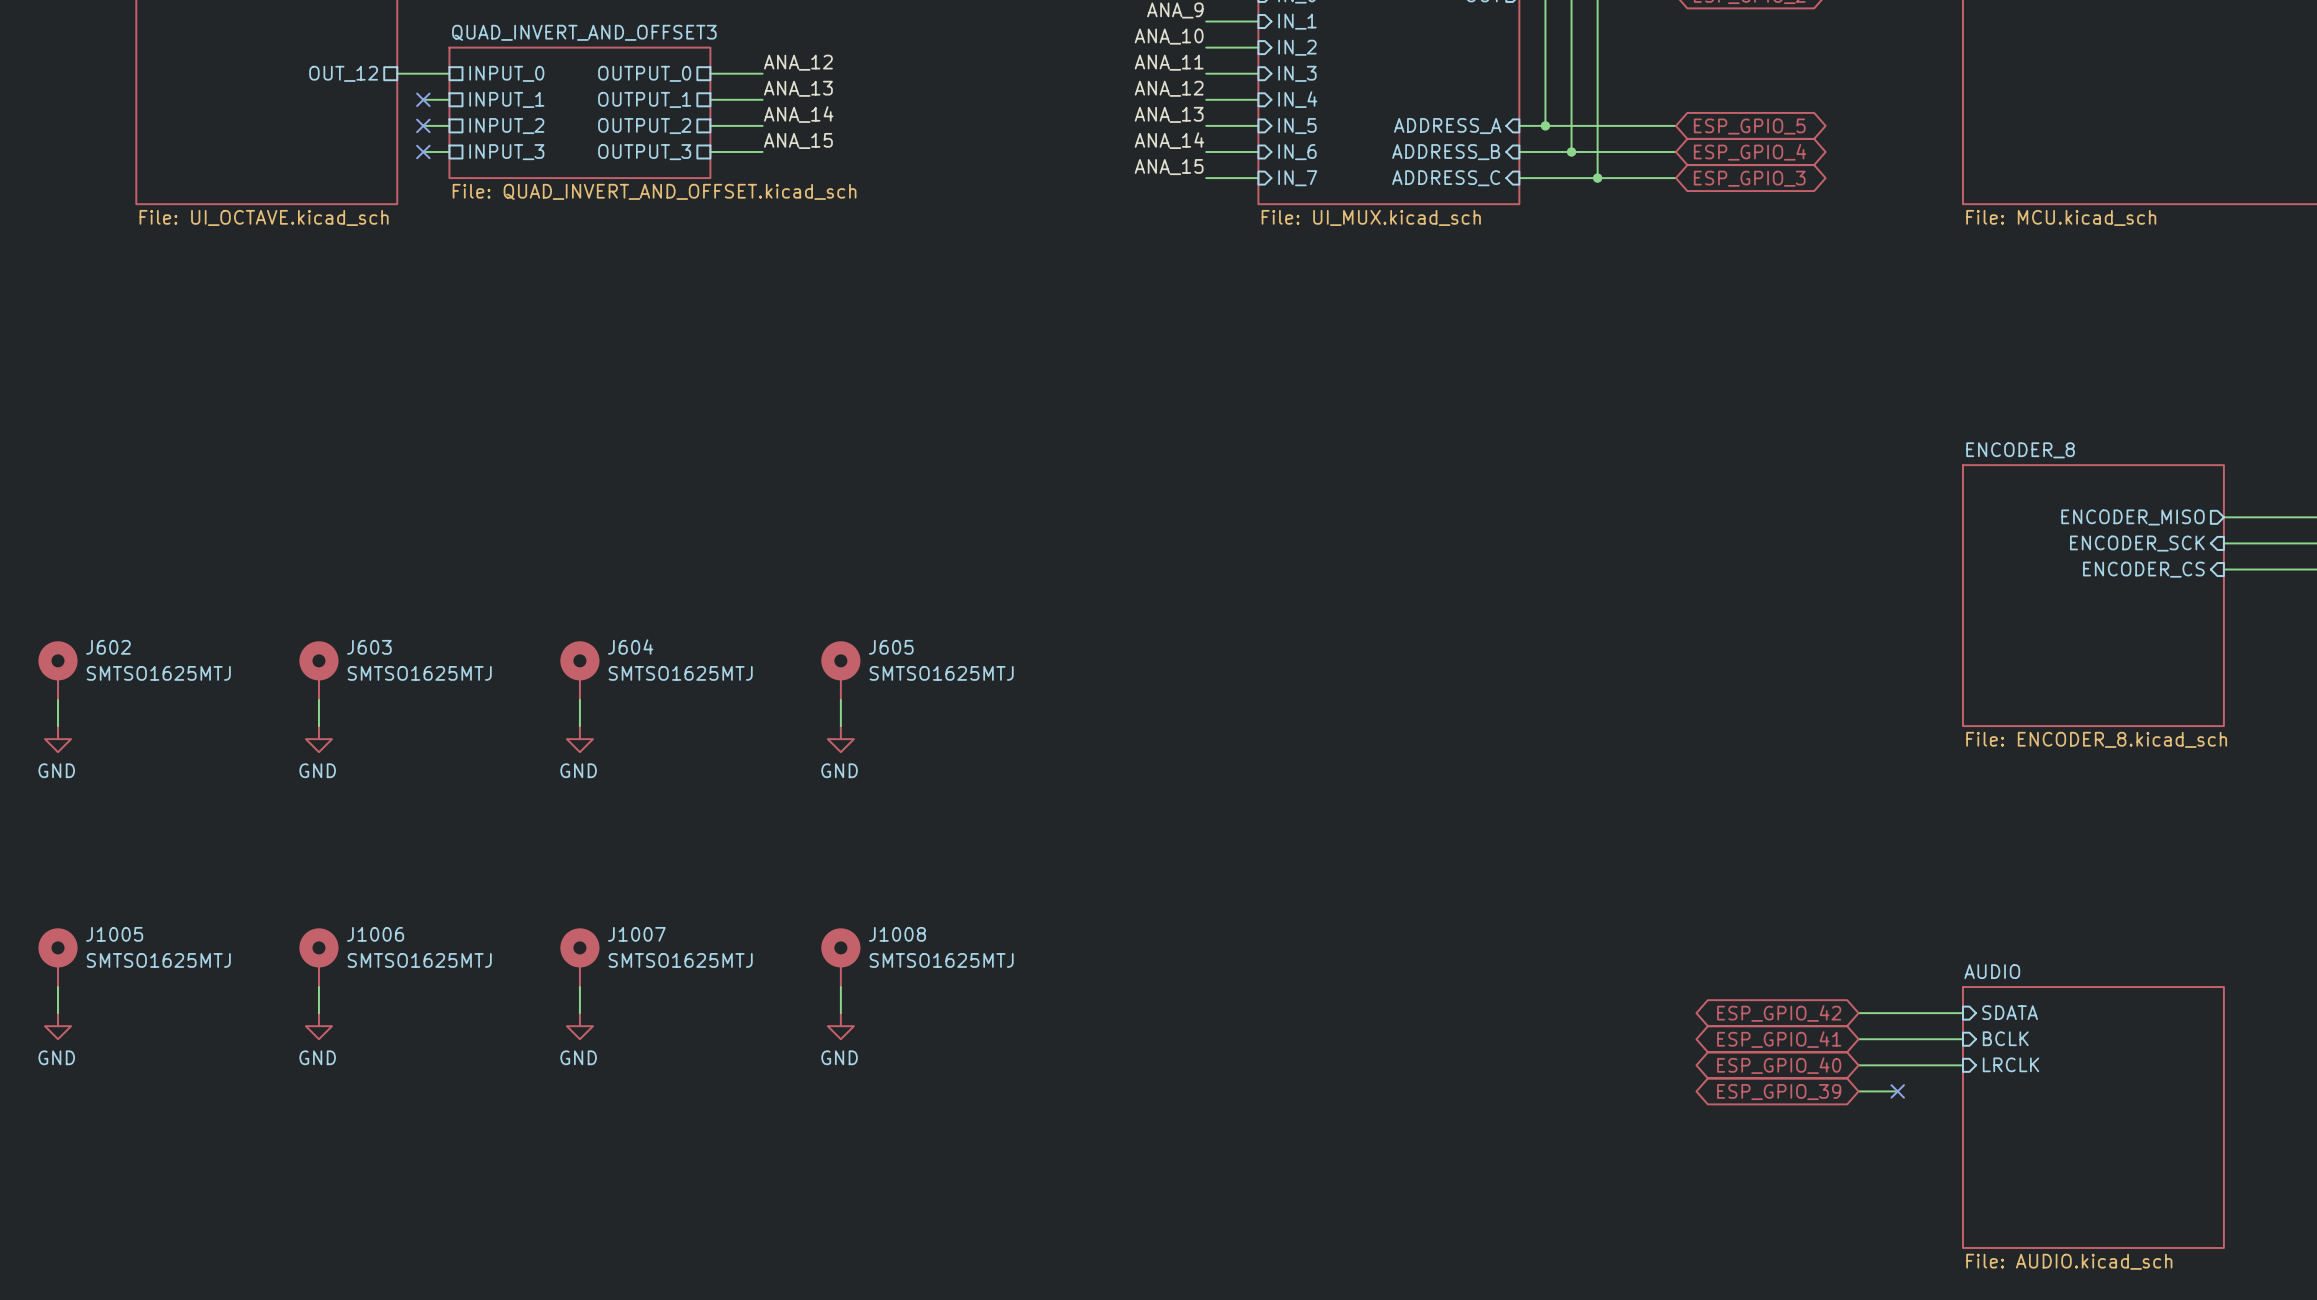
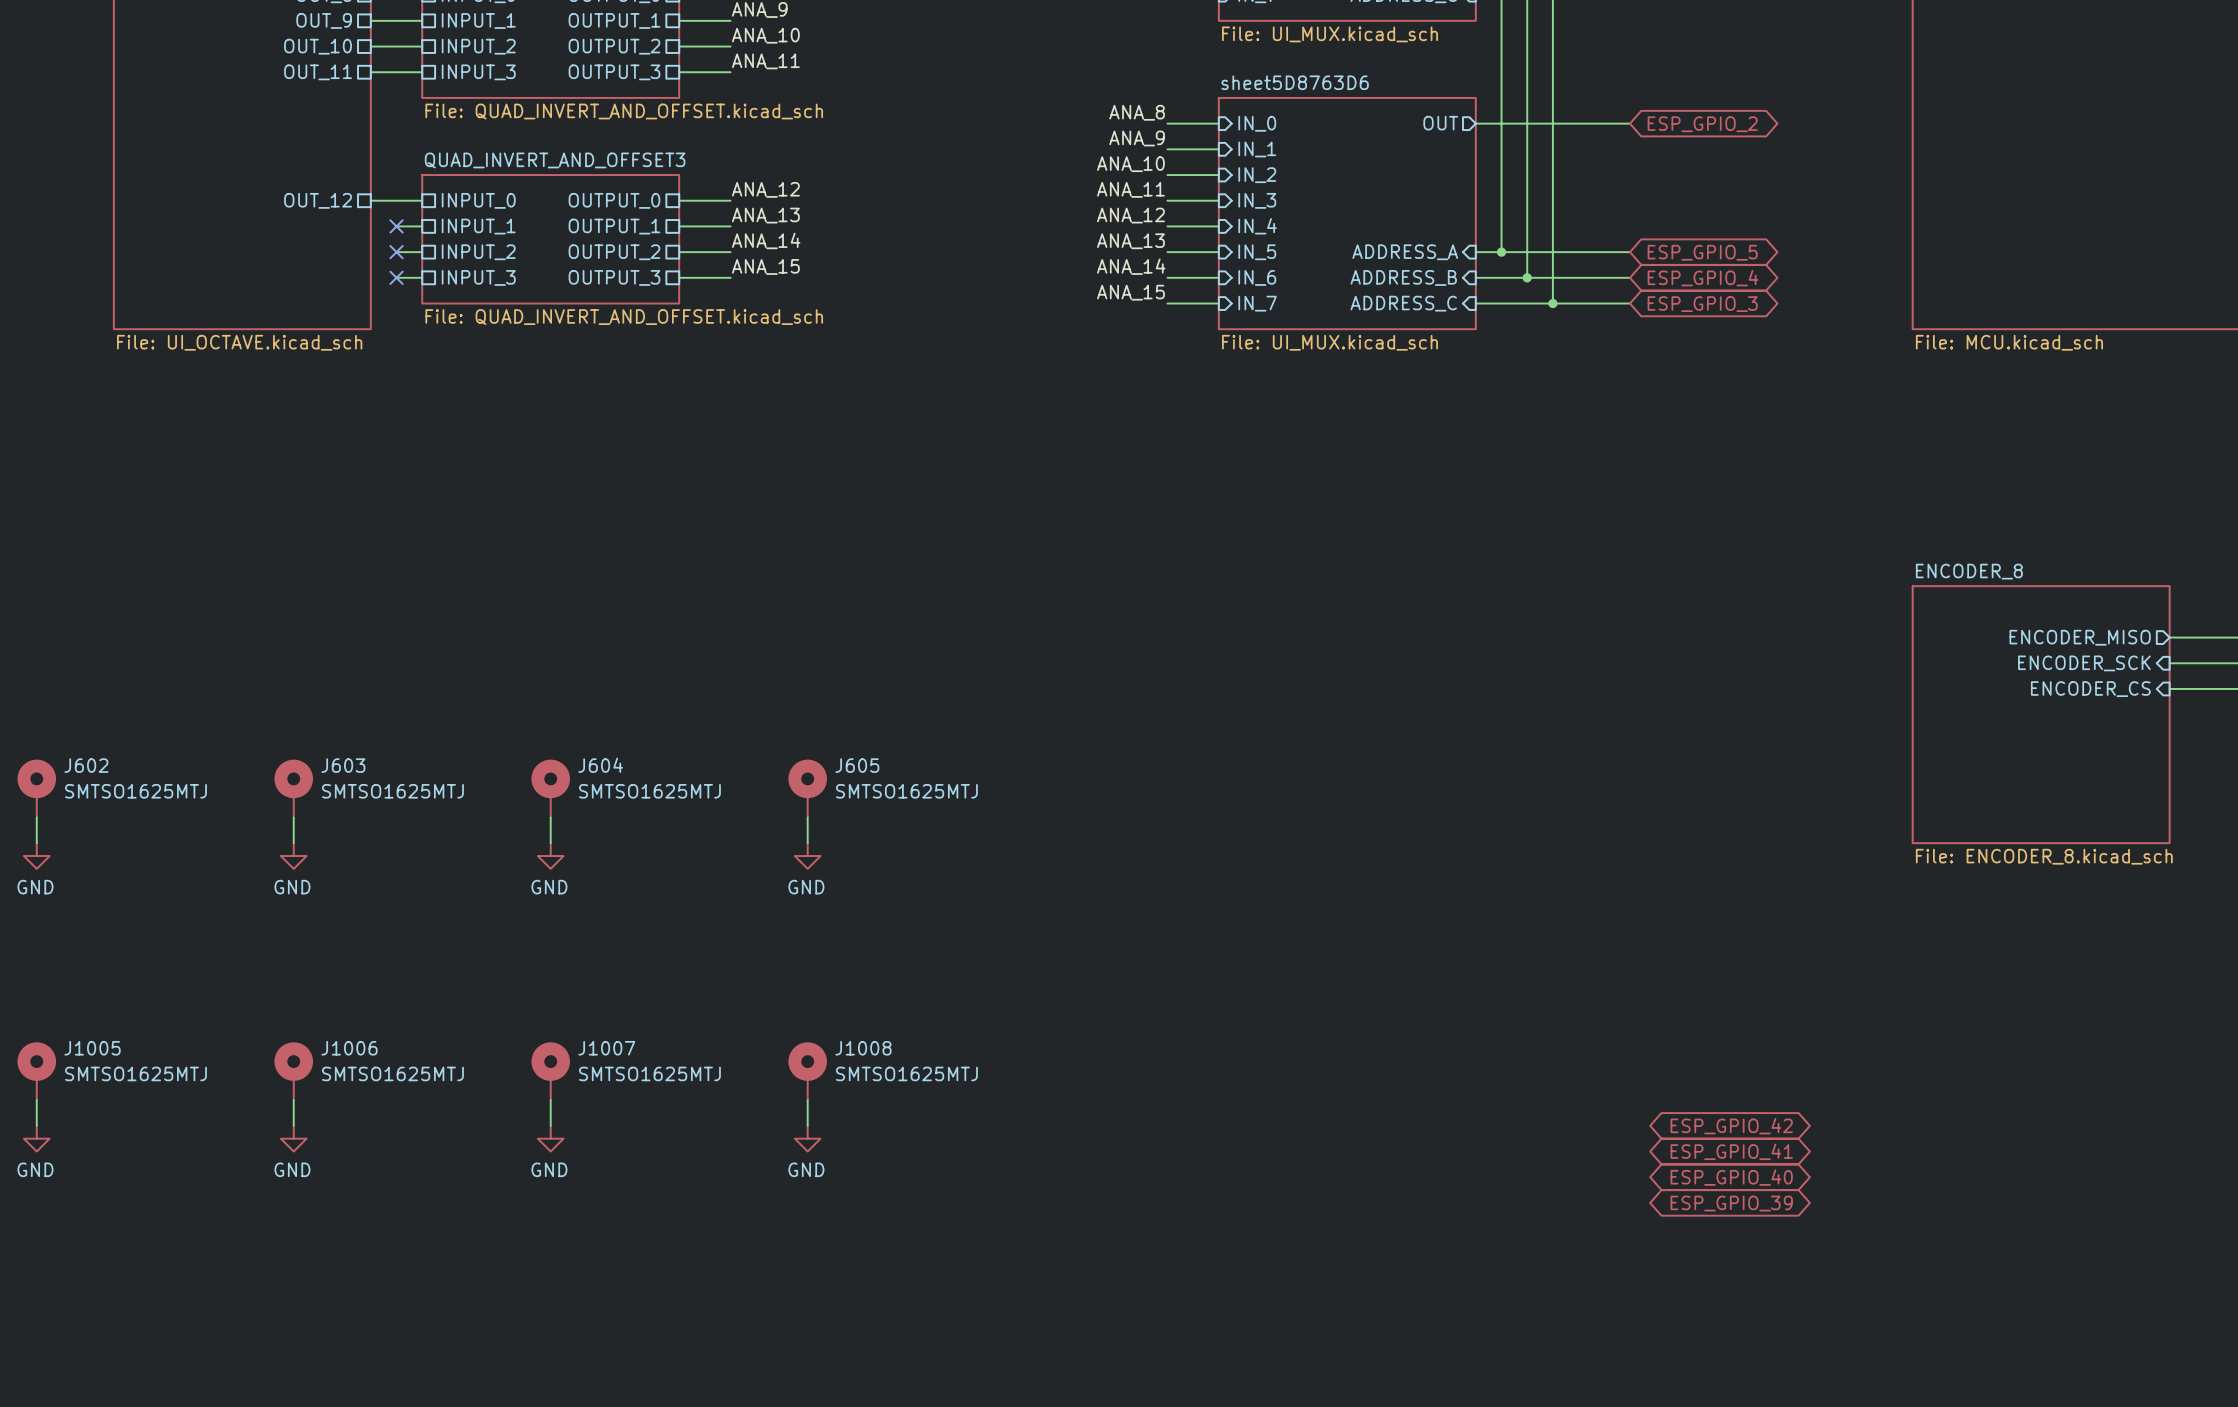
sheet pin: SDATA (2010, 1012) -> none
wire: (1858, 1013) (1962, 1013) -> none
sheet pin: BCLK (2005, 1038) -> none
wire: (1858, 1039) (1962, 1039) -> none
sheet pin: LRCLK (2011, 1064) -> none
wire: (1858, 1065) (1962, 1065) -> none
wire: (1858, 1091) (1897, 1091) -> none
no-connect mark: (1897, 1091) -> none
sheet AUDIO: File: AUDIO.kicad_sch (2093, 1117) -> none

